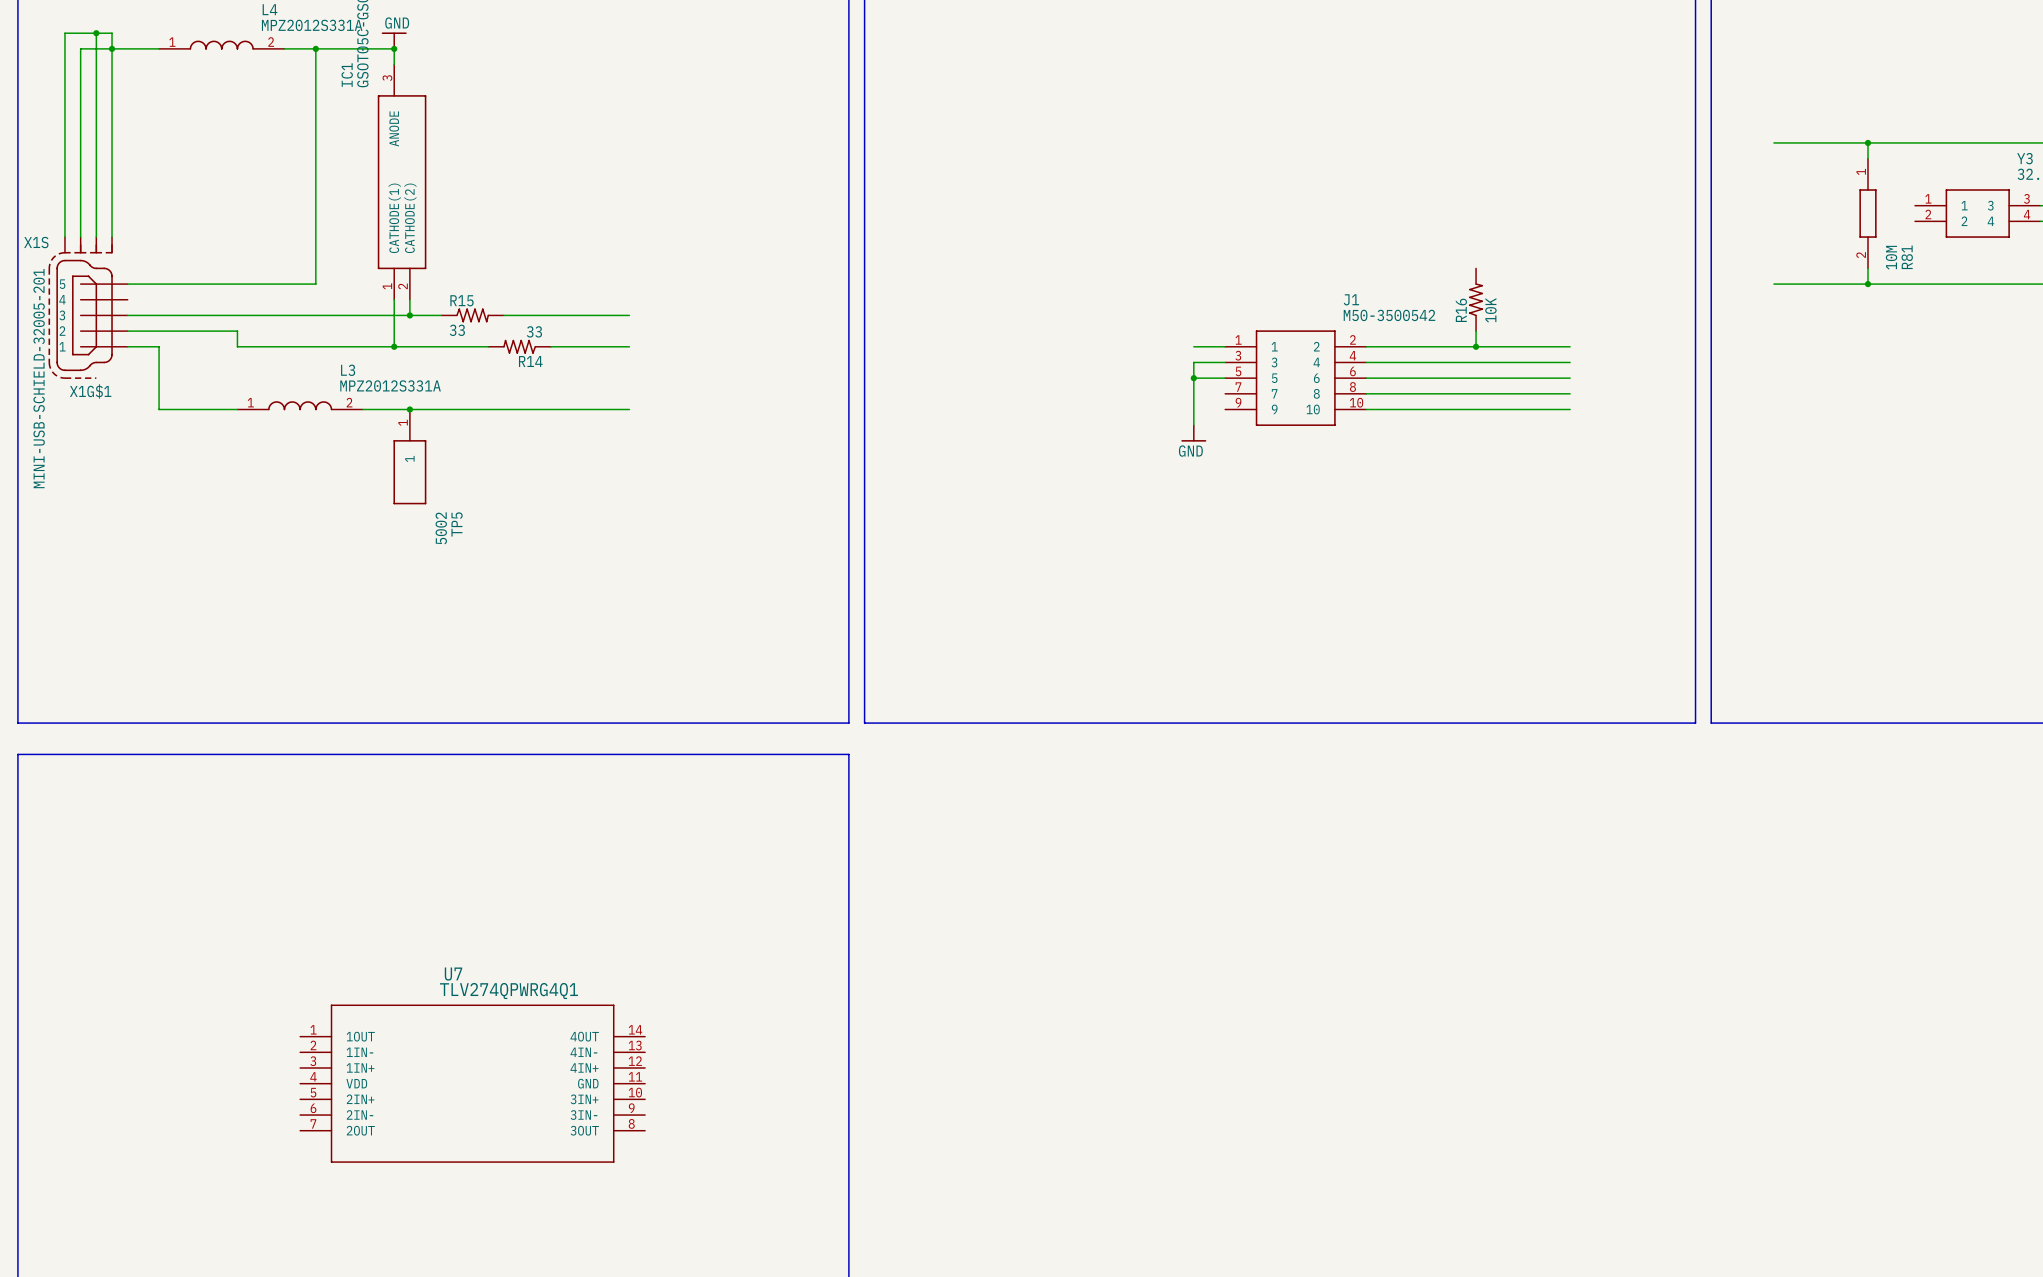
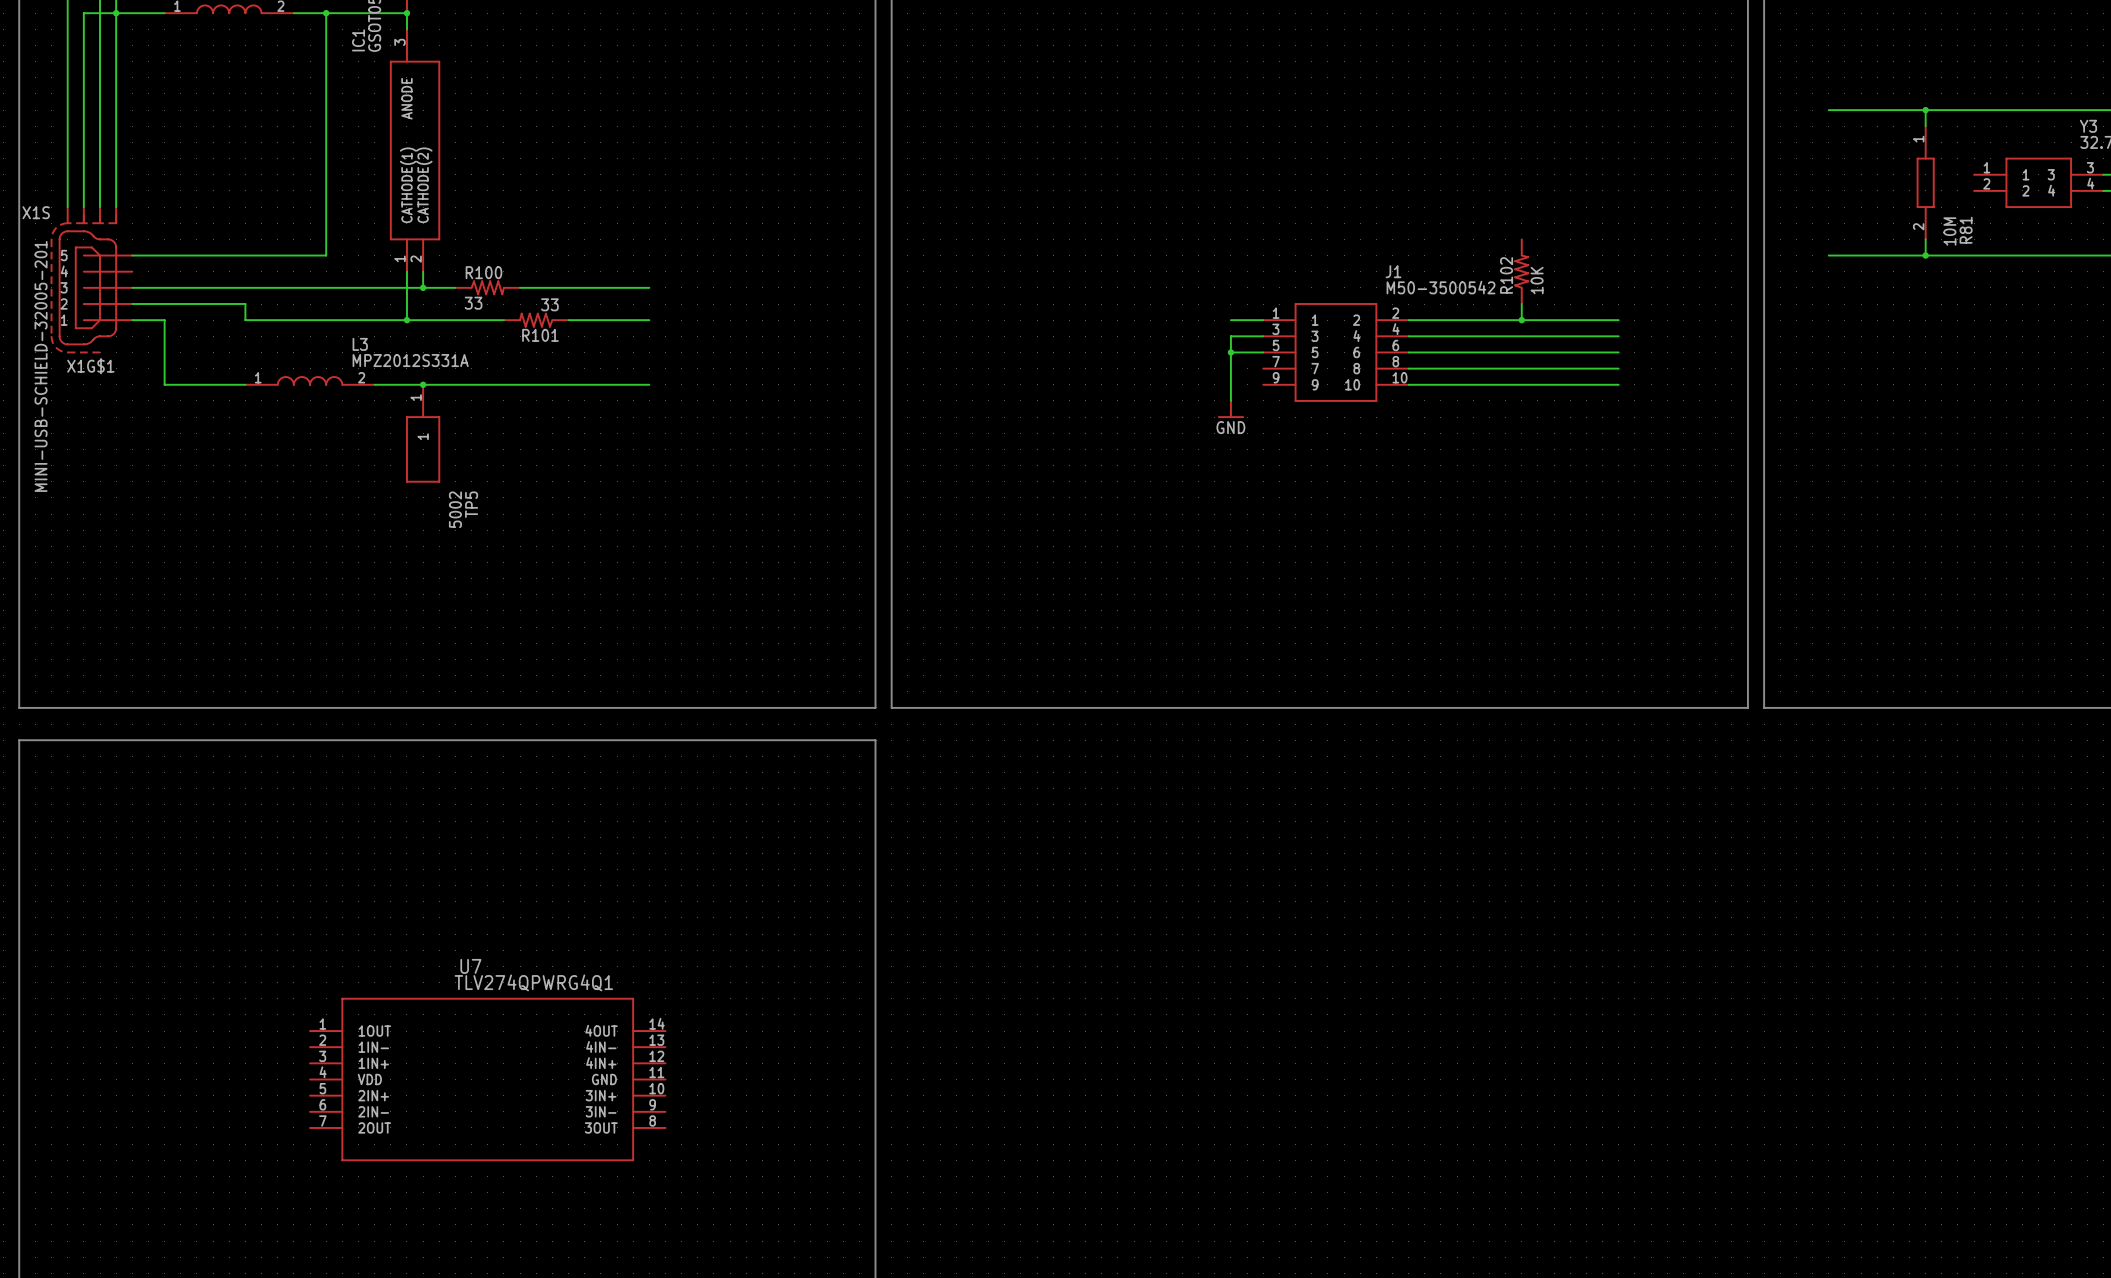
R15 name: R15 (462, 300) -> R100 (483, 272)
R16 name: R16 (1461, 310) -> R102 (1506, 275)
R14 name: R14 (530, 361) -> R101 (540, 335)

